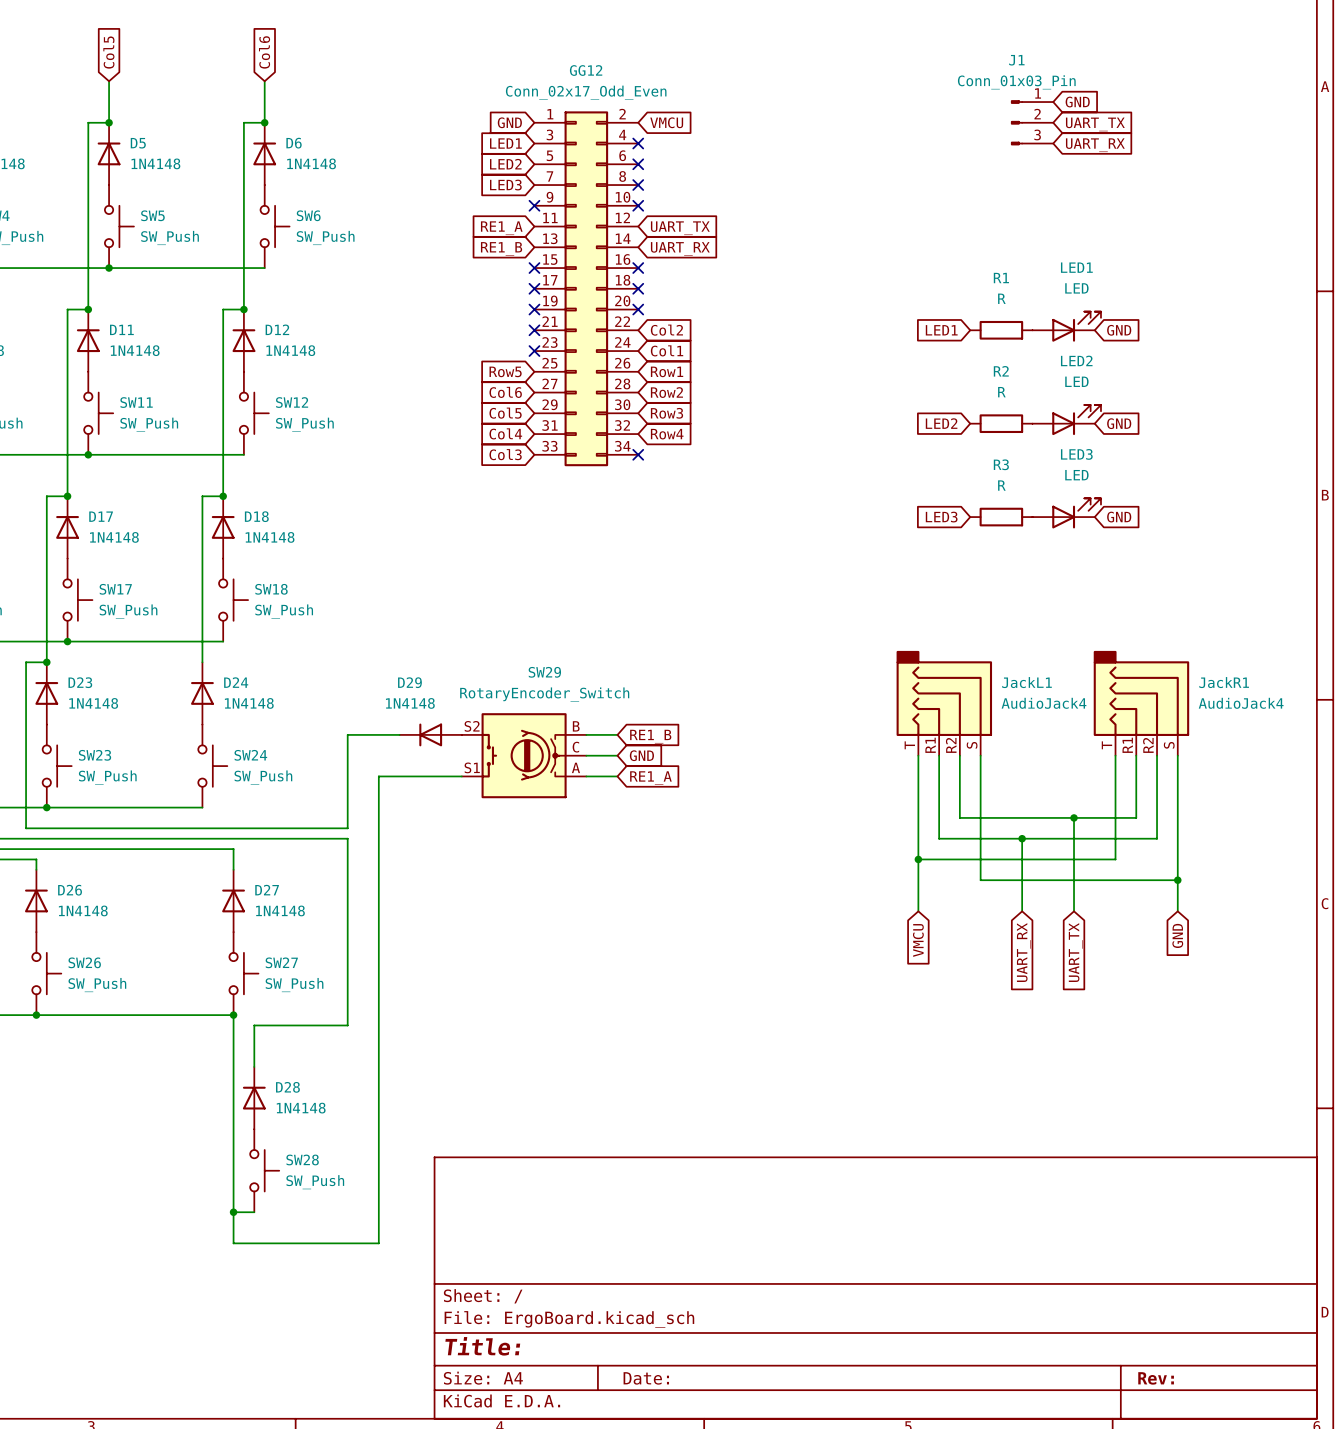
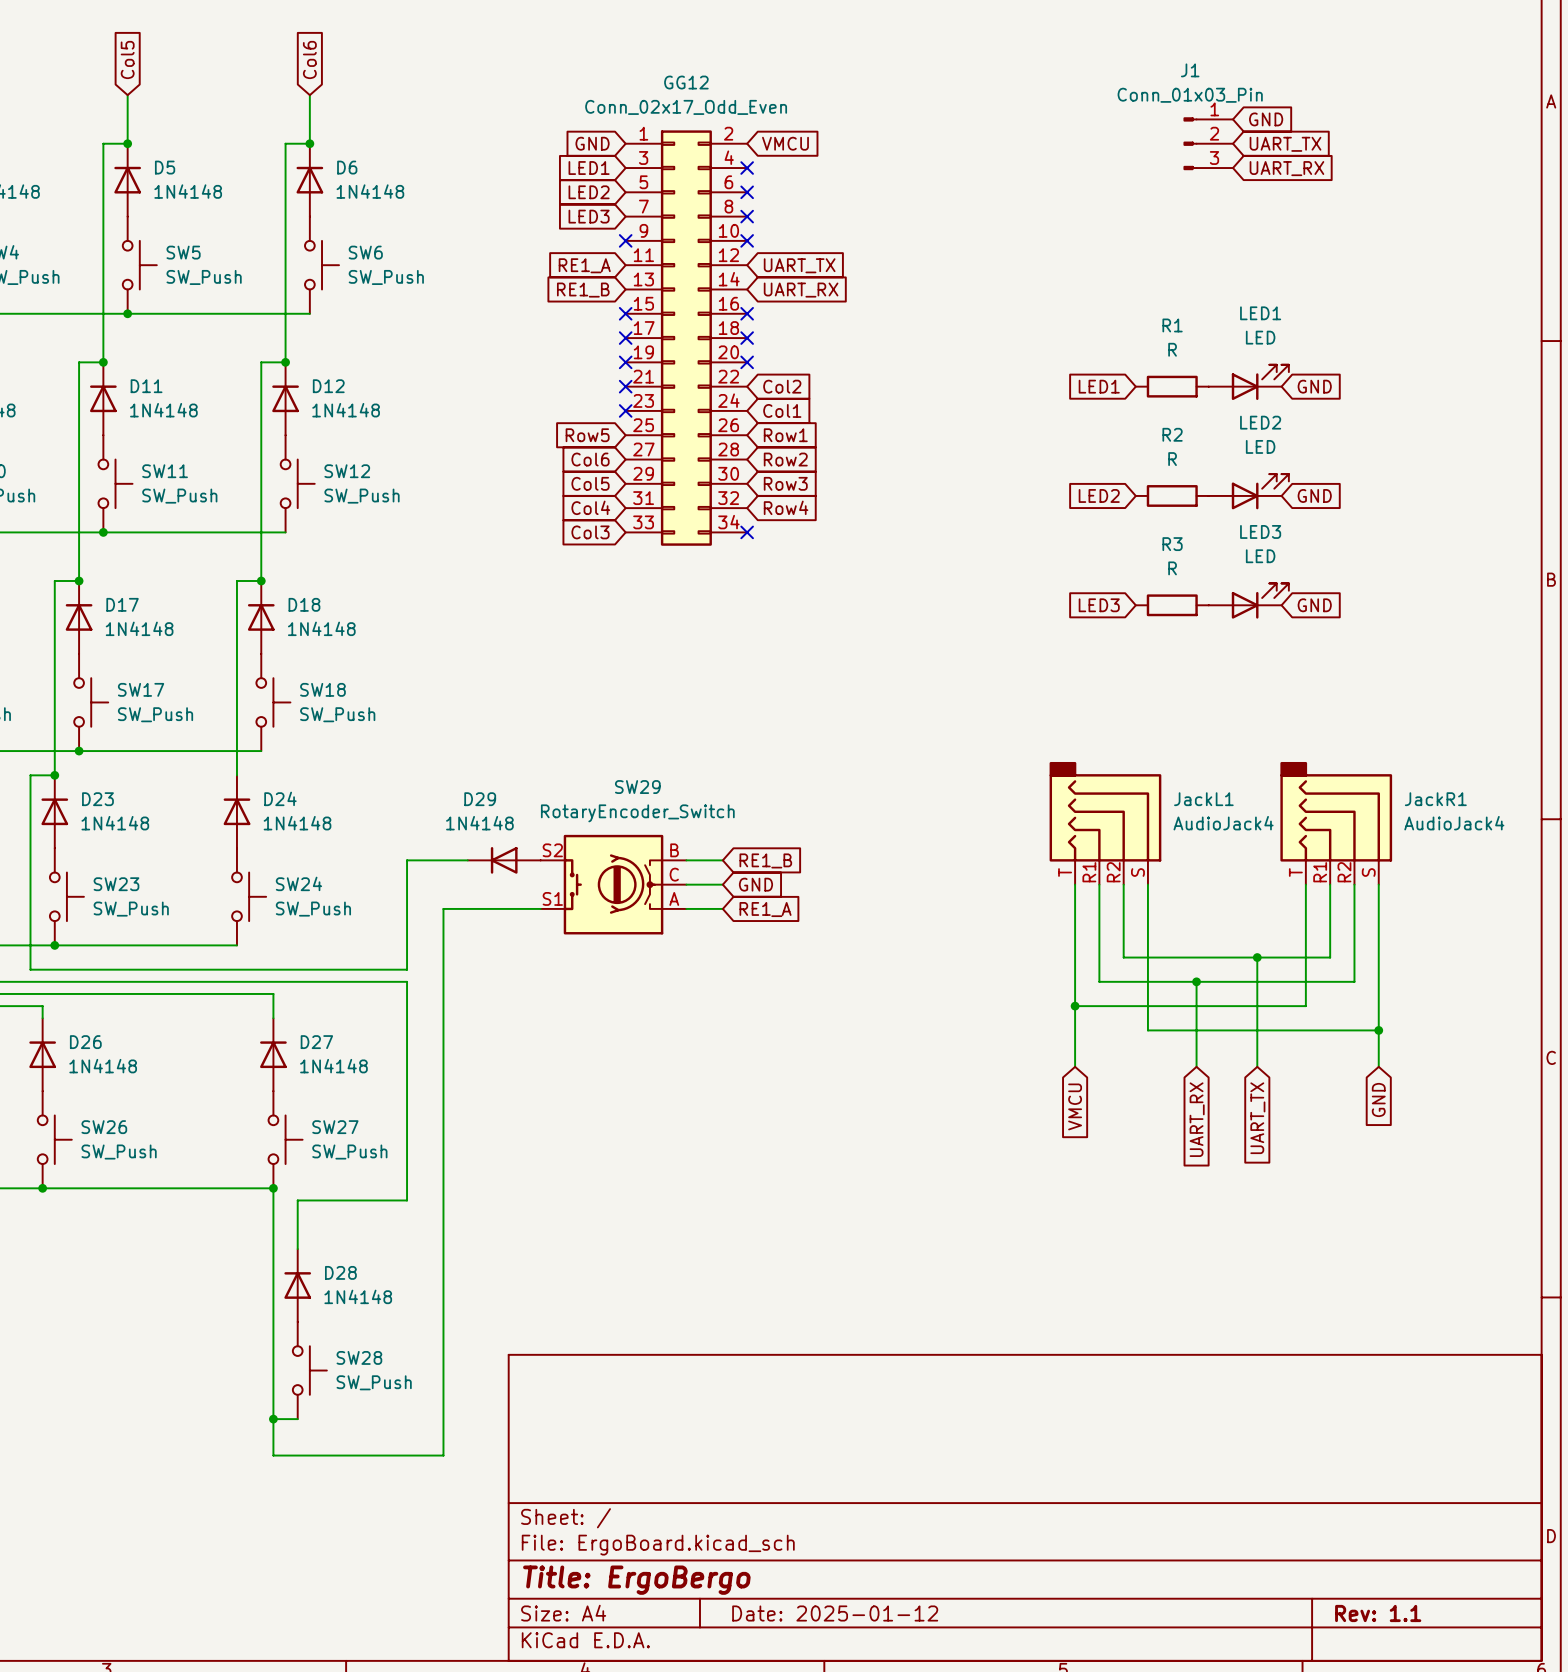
title block: Title: (482, 1346) -> Title: ErgoBergo (636, 1580)
title block: Date: (646, 1378) -> Date: 2025-01-12 (835, 1613)
title block: Rev: (1156, 1378) -> Rev: 1.1 (1378, 1613)

